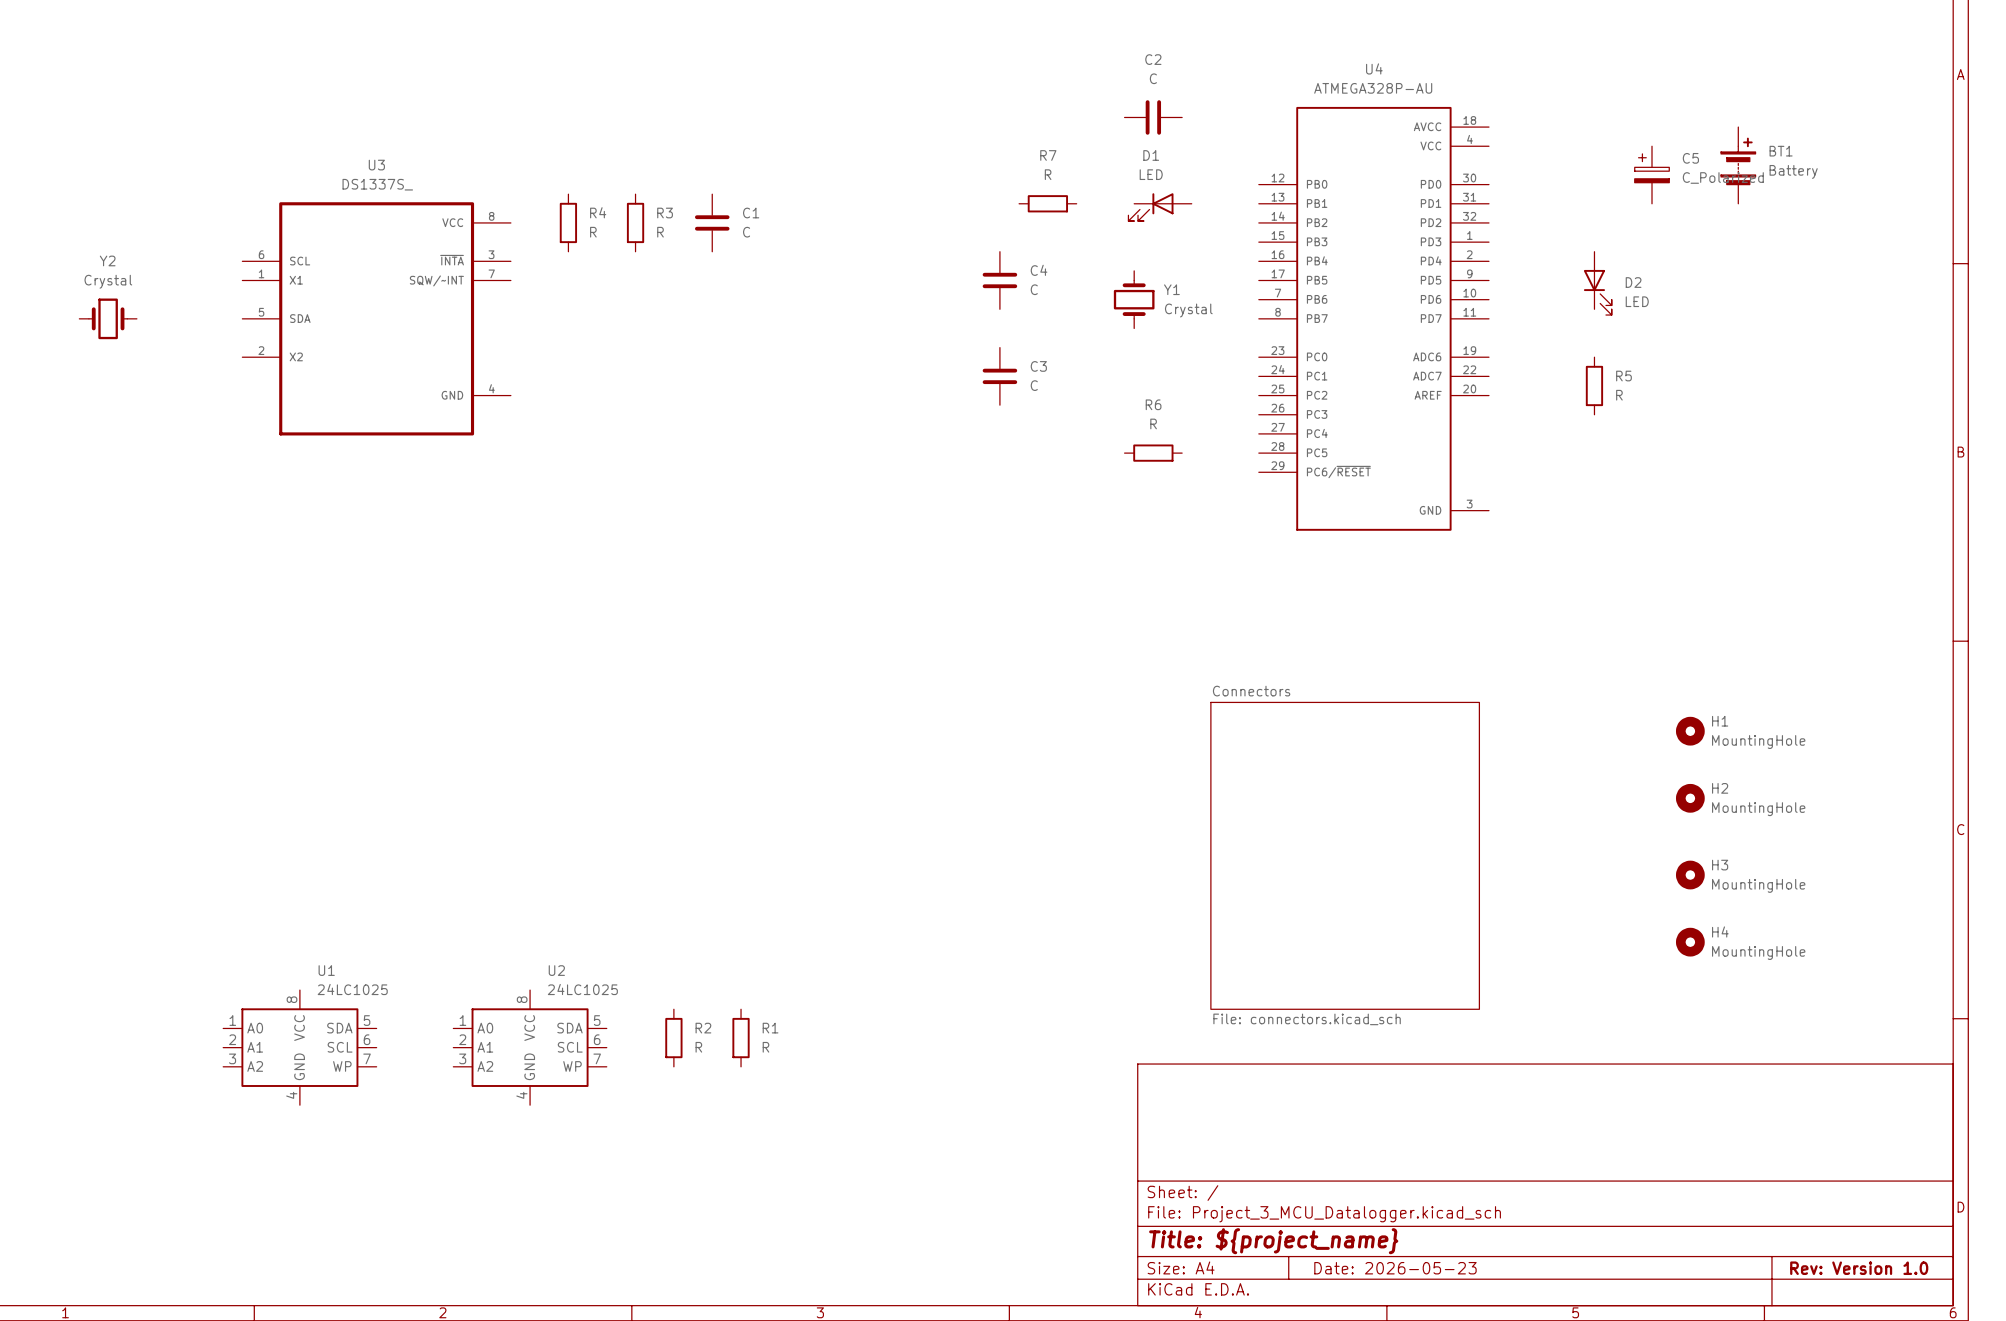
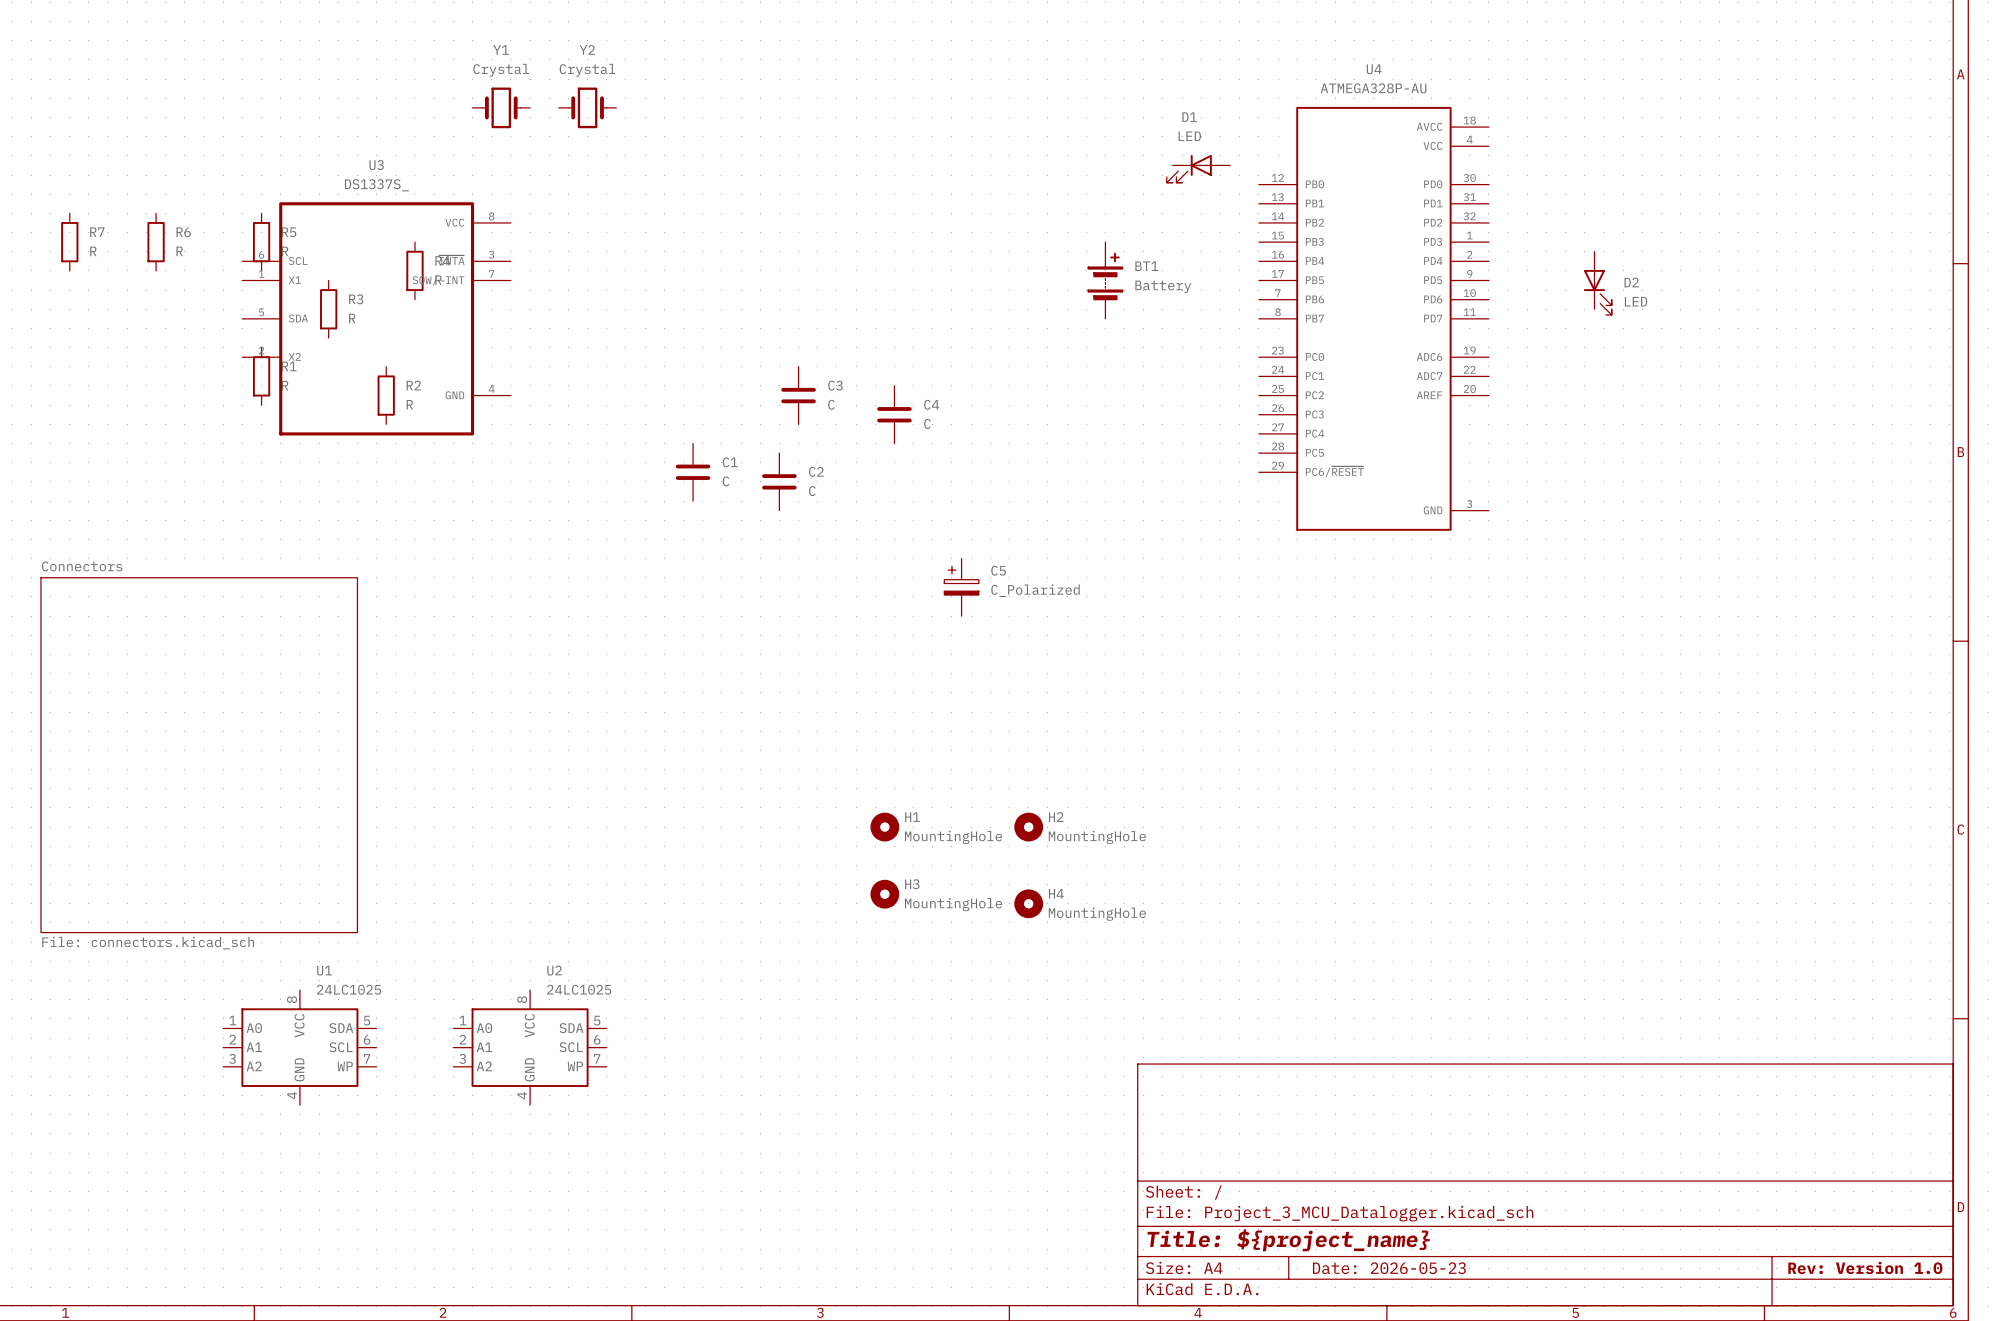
C2 name position: C2 (1153, 59) -> C2 (816, 471)
C2 rotation: 0° (1153, 117) -> 90° clockwise (779, 481)
C2 position: (1153, 117) -> (779, 481)
R7 name position: R7 (1048, 155) -> R7 (97, 232)
BT1 position: (1738, 165) -> (1105, 280)
C5 position: (1652, 175) -> (961, 587)
R7 rotation: 0° (1047, 203) -> 90° clockwise (69, 242)
R7 position: (1047, 203) -> (69, 242)
D1 position: (1160, 207) -> (1198, 168)
R4 position: (568, 222) -> (414, 270)
R3 position: (635, 222) -> (328, 309)
C1 position: (712, 222) -> (693, 472)
C4 position: (999, 280) -> (894, 414)
Y1 name position: Y1 (1171, 289) -> Y1 (501, 49)
Y1 rotation: 0° (1134, 299) -> 90° clockwise (501, 107)
Y1 position: (1134, 299) -> (501, 107)
Y1 value position: Crystal (1188, 310) -> Crystal (501, 70)
Y2 position: (108, 318) -> (587, 107)
C3 position: (999, 376) -> (798, 395)
R5 position: (1594, 385) -> (261, 242)
R6 name position: R6 (1153, 404) -> R6 (183, 232)
R6 rotation: 0° (1153, 453) -> 90° clockwise (156, 242)
R6 position: (1153, 453) -> (156, 242)
H1 position: (1690, 731) -> (884, 827)
sheet Connectors: none -> File: connectors.kicad_sch (199, 755)
H2 position: (1690, 798) -> (1028, 827)
sheet Connectors: File: connectors.kicad_sch (1345, 855) -> none
H3 position: (1690, 875) -> (884, 894)
H4 position: (1690, 942) -> (1028, 903)
R2 position: (673, 1038) -> (386, 395)
R1 position: (741, 1038) -> (261, 376)

